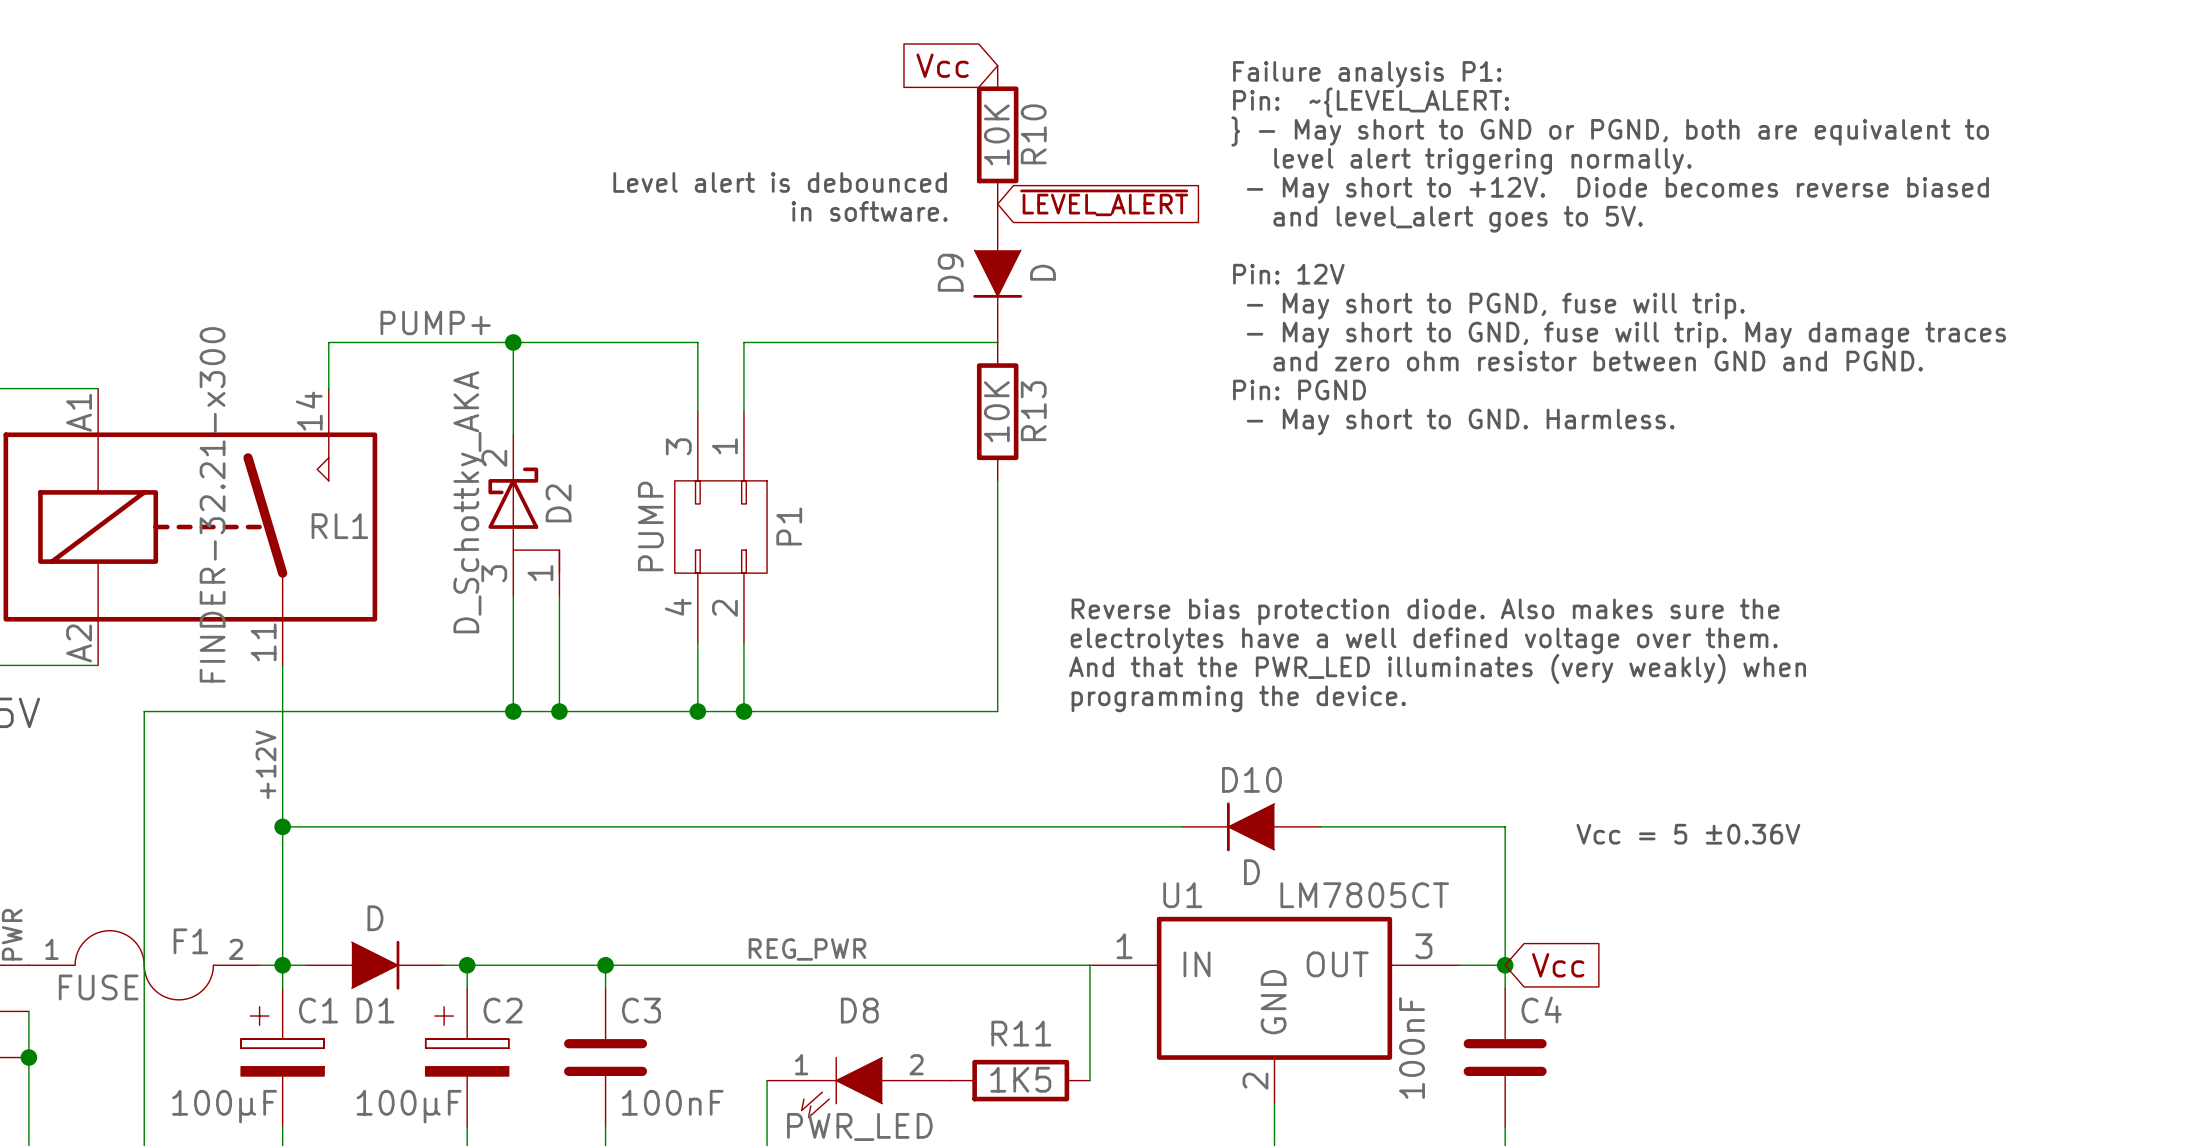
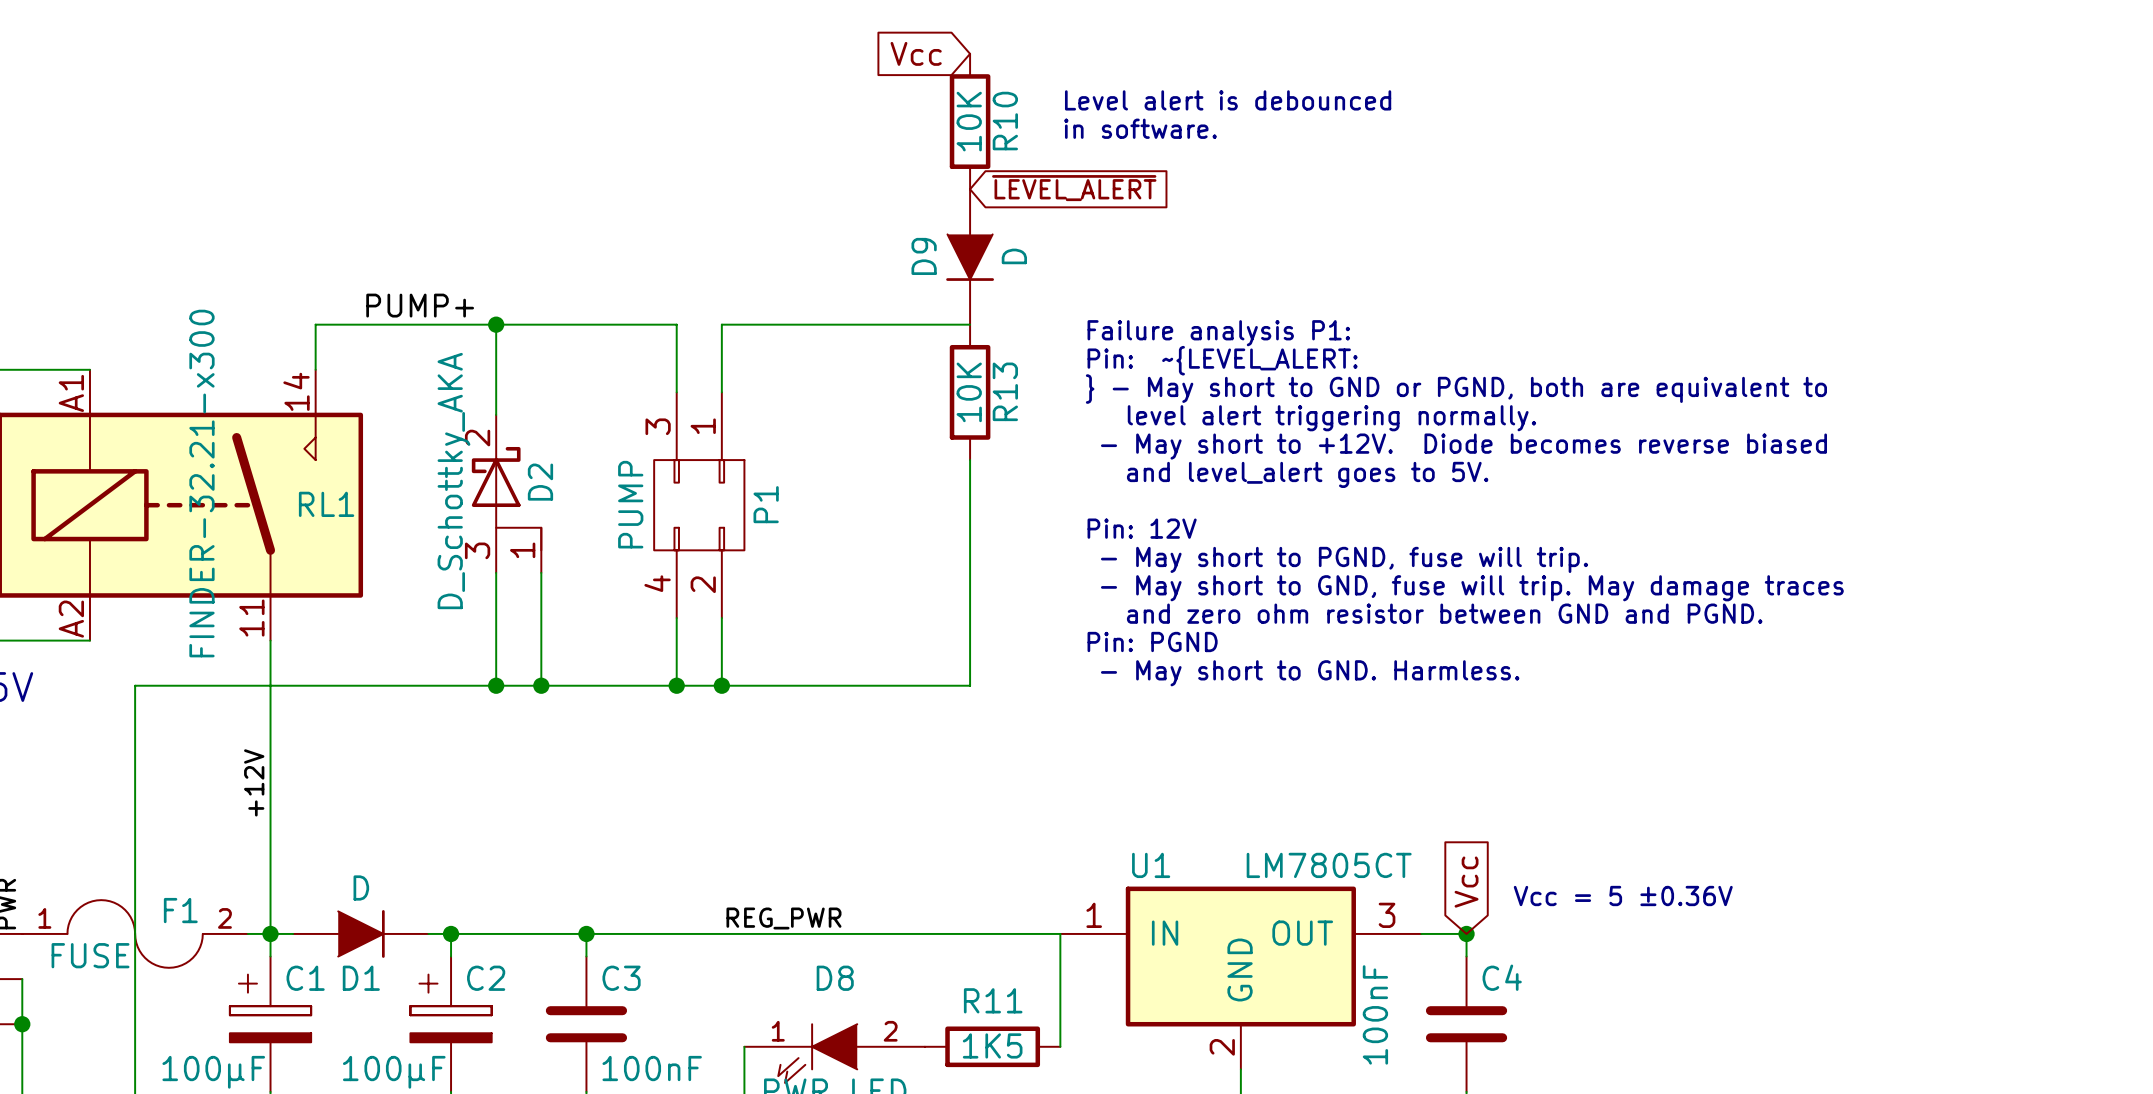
text position: Failure analysis P1: (1367, 74) -> Failure analysis P1: (1218, 333)
text position: Pin: ~{LEVEL_ALERT: (1371, 102) -> Pin: ~{LEVEL_ALERT: (1222, 360)
text position: } - May short to GND or PGND, both are equivalent to (1610, 131) -> } - May short to GND or PGND, both are equivalent to (1456, 389)
text position: level alert triggering normally. (1482, 161) -> level alert triggering normally. (1331, 418)
text position: Level alert is debounced (780, 182) -> Level alert is debounced (1228, 100)
text position: - May short to +12V. Diode becomes reverse biased (1617, 190) -> - May short to +12V. Diode becomes reverse biased (1463, 446)
text position: in software. (869, 211) -> in software. (1140, 128)
text position: and level_alert goes to 5V. (1458, 219) -> and level_alert goes to 5V. (1307, 474)
text position: Pin: 12V (1288, 274) -> Pin: 12V (1142, 528)
text position: - May short to PGND, fuse will trip. (1495, 306) -> - May short to PGND, fuse will trip. (1344, 559)
text position: - May short to GND, fuse will trip. May damage traces (1626, 335) -> - May short to GND, fuse will trip. May damage traces (1472, 588)
text position: and zero ohm resistor between GND and PGND. (1598, 361) -> and zero ohm resistor between GND and PGND. (1444, 613)
text position: Pin: PGND (1299, 390) -> Pin: PGND (1152, 641)
text position: - May short to GND. Harmless. (1460, 422) -> - May short to GND. Harmless. (1310, 673)
text: Reverse bias protection diode. Also makes sure the (1425, 611) -> none
text: electrolytes have a well defined voltage over them. (1424, 640) -> none
text: And that the PWR_LED illuminates (very weakly) when (1437, 668) -> none
text: programming the device. (1238, 698) -> none
label position: +12V (265, 764) -> +12V (254, 782)
wire: (282, 826) (1182, 826) -> none
junction: (282, 826) -> none
D10: D (1251, 826) -> none
wire: (1320, 826) (1505, 826) (1505, 965) -> none
text position: Vcc = 5 ±0.36V (1688, 834) -> Vcc = 5 ±0.36V (1623, 896)
global label rotation: 0° (1558, 965) -> 90° counterclockwise (1466, 882)

